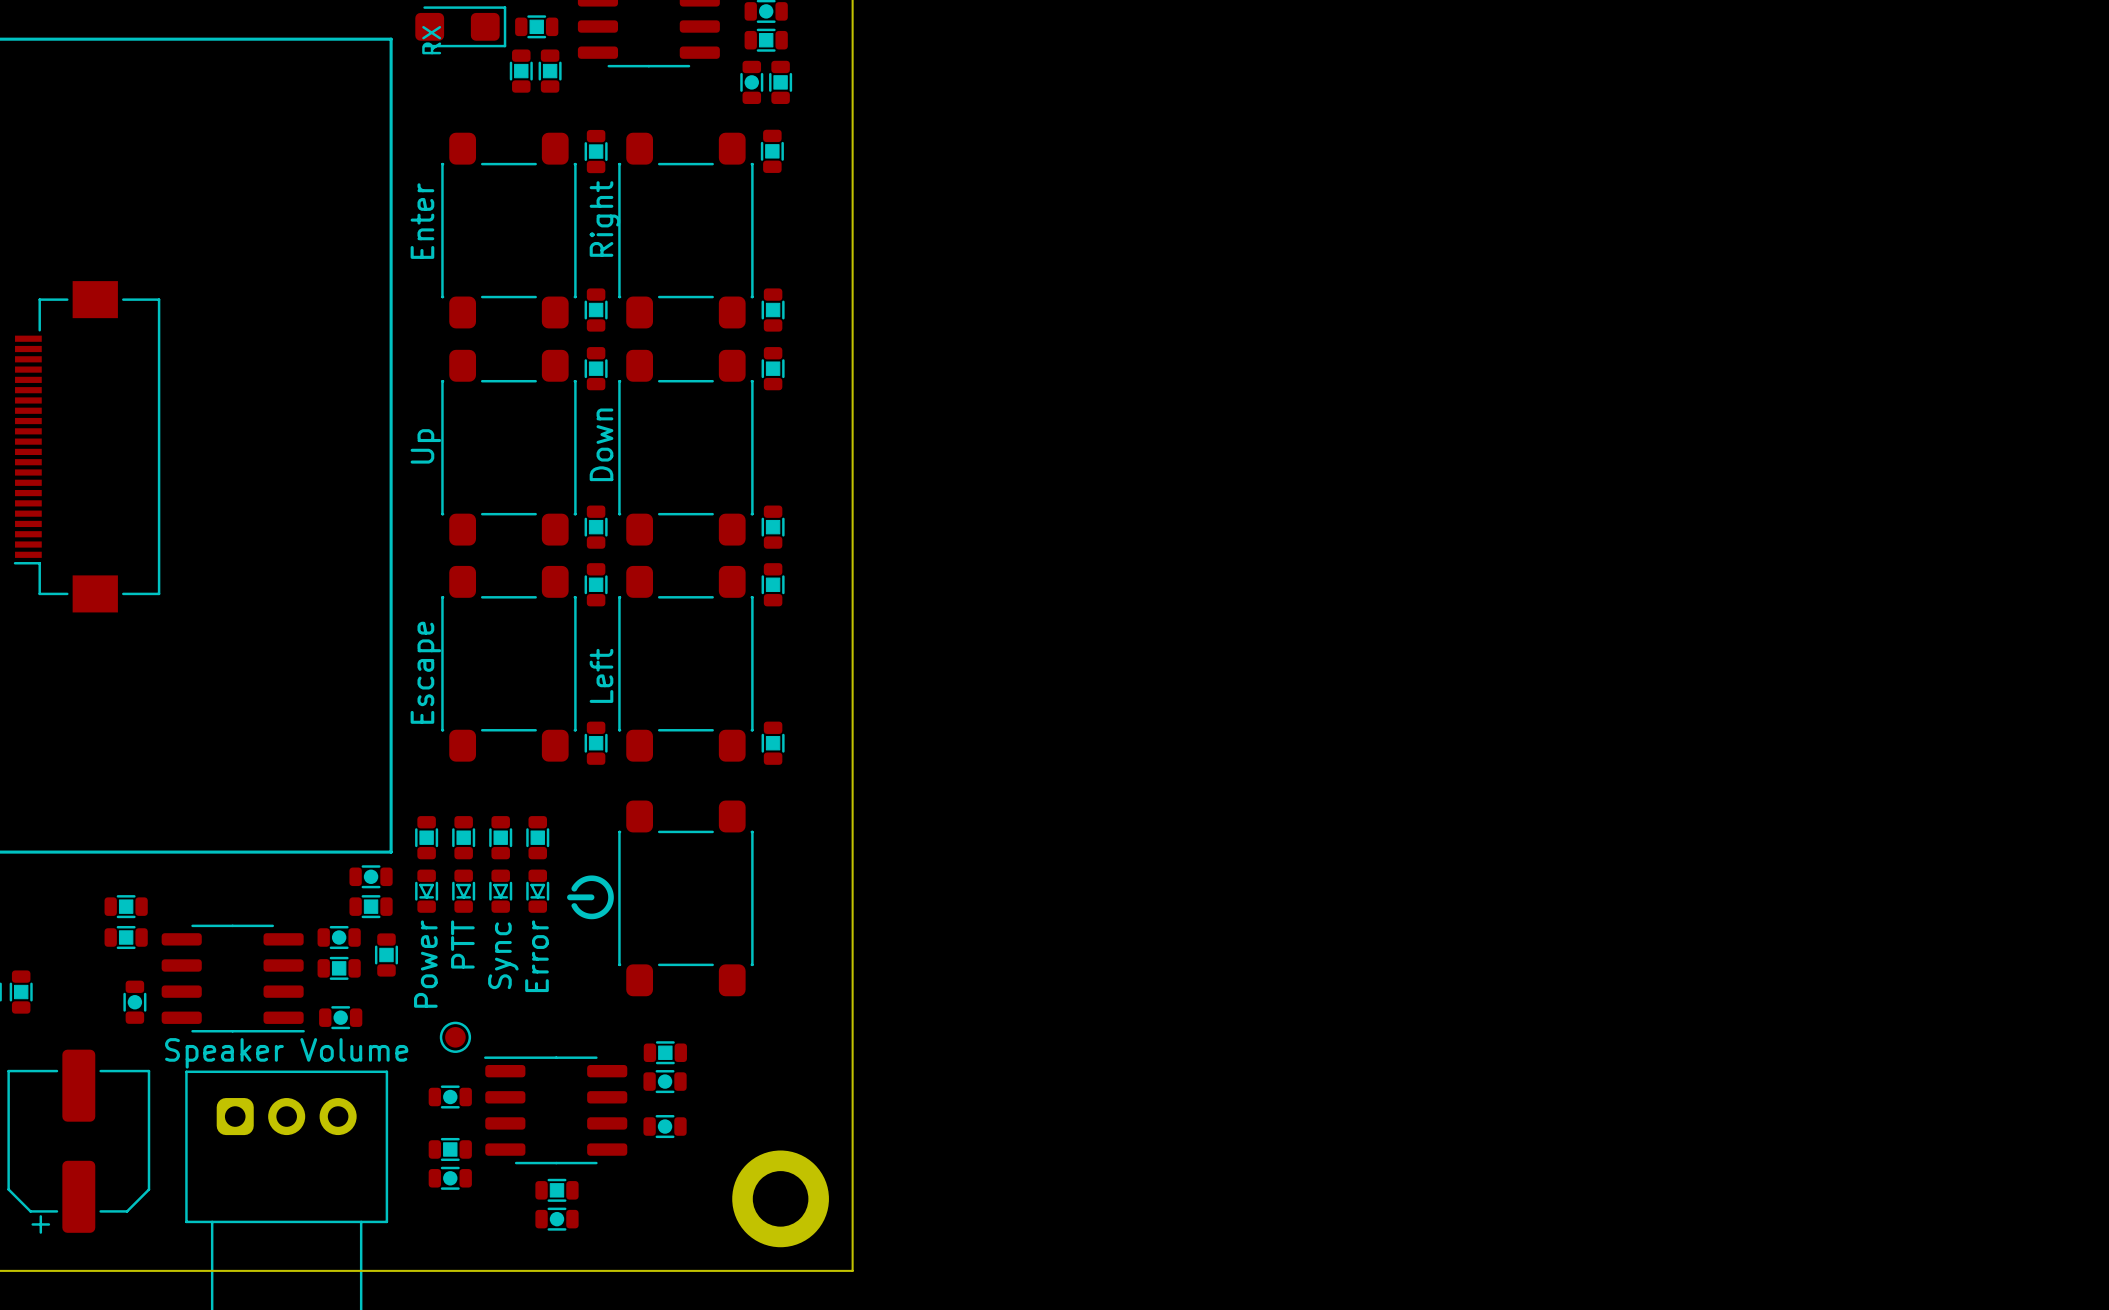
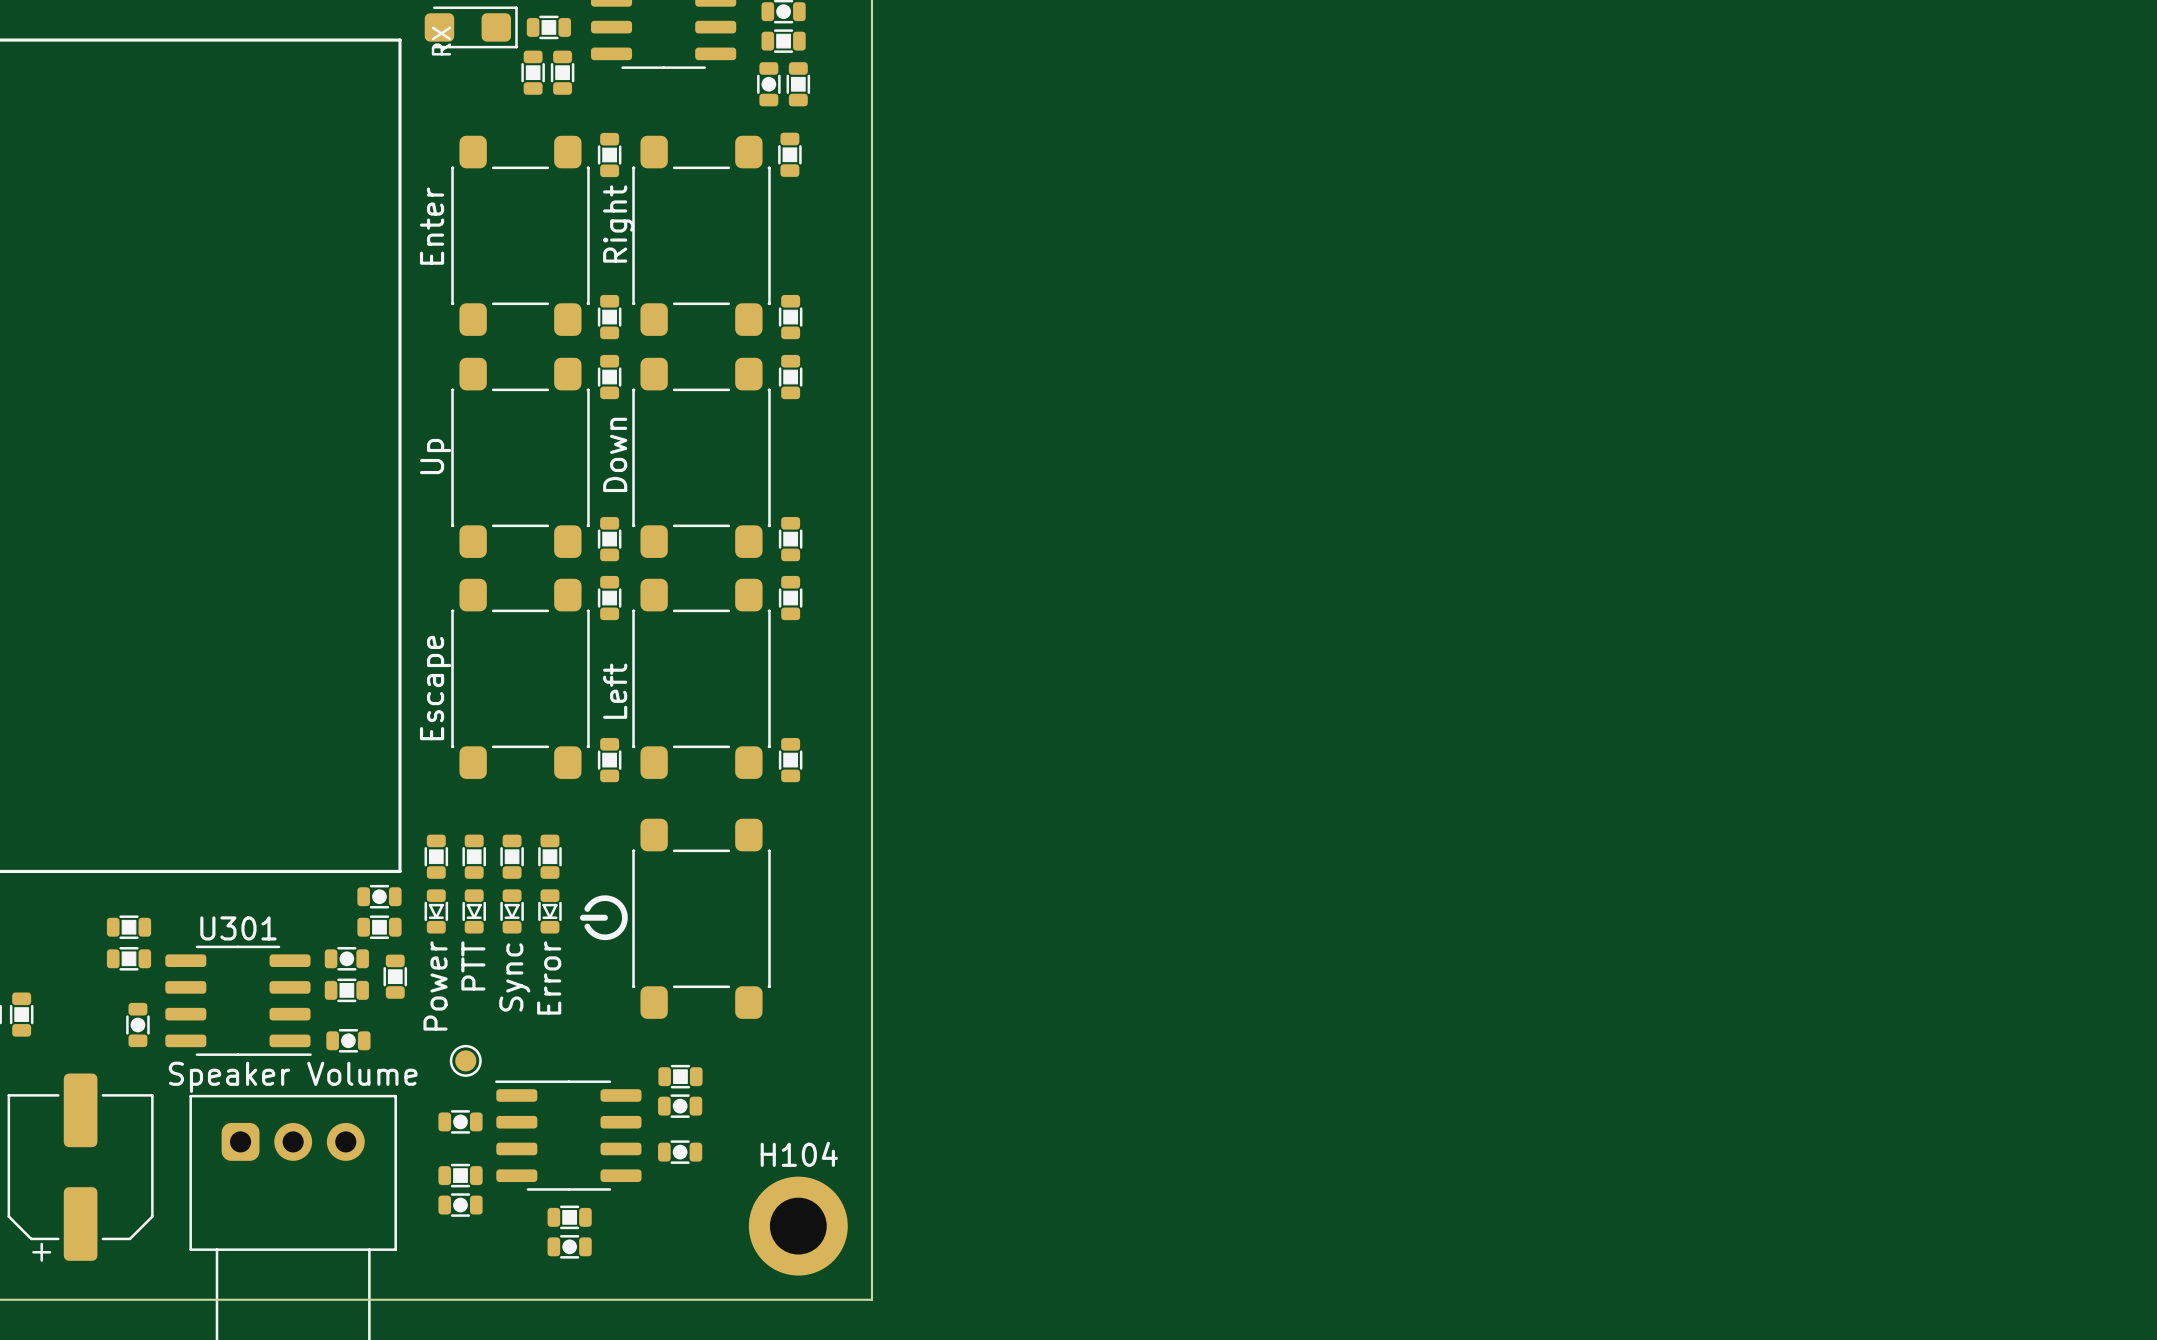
part: (87, 446) -> none
U301 name: none -> U301 (238, 928)
H104 name: none -> H104 (799, 1154)

